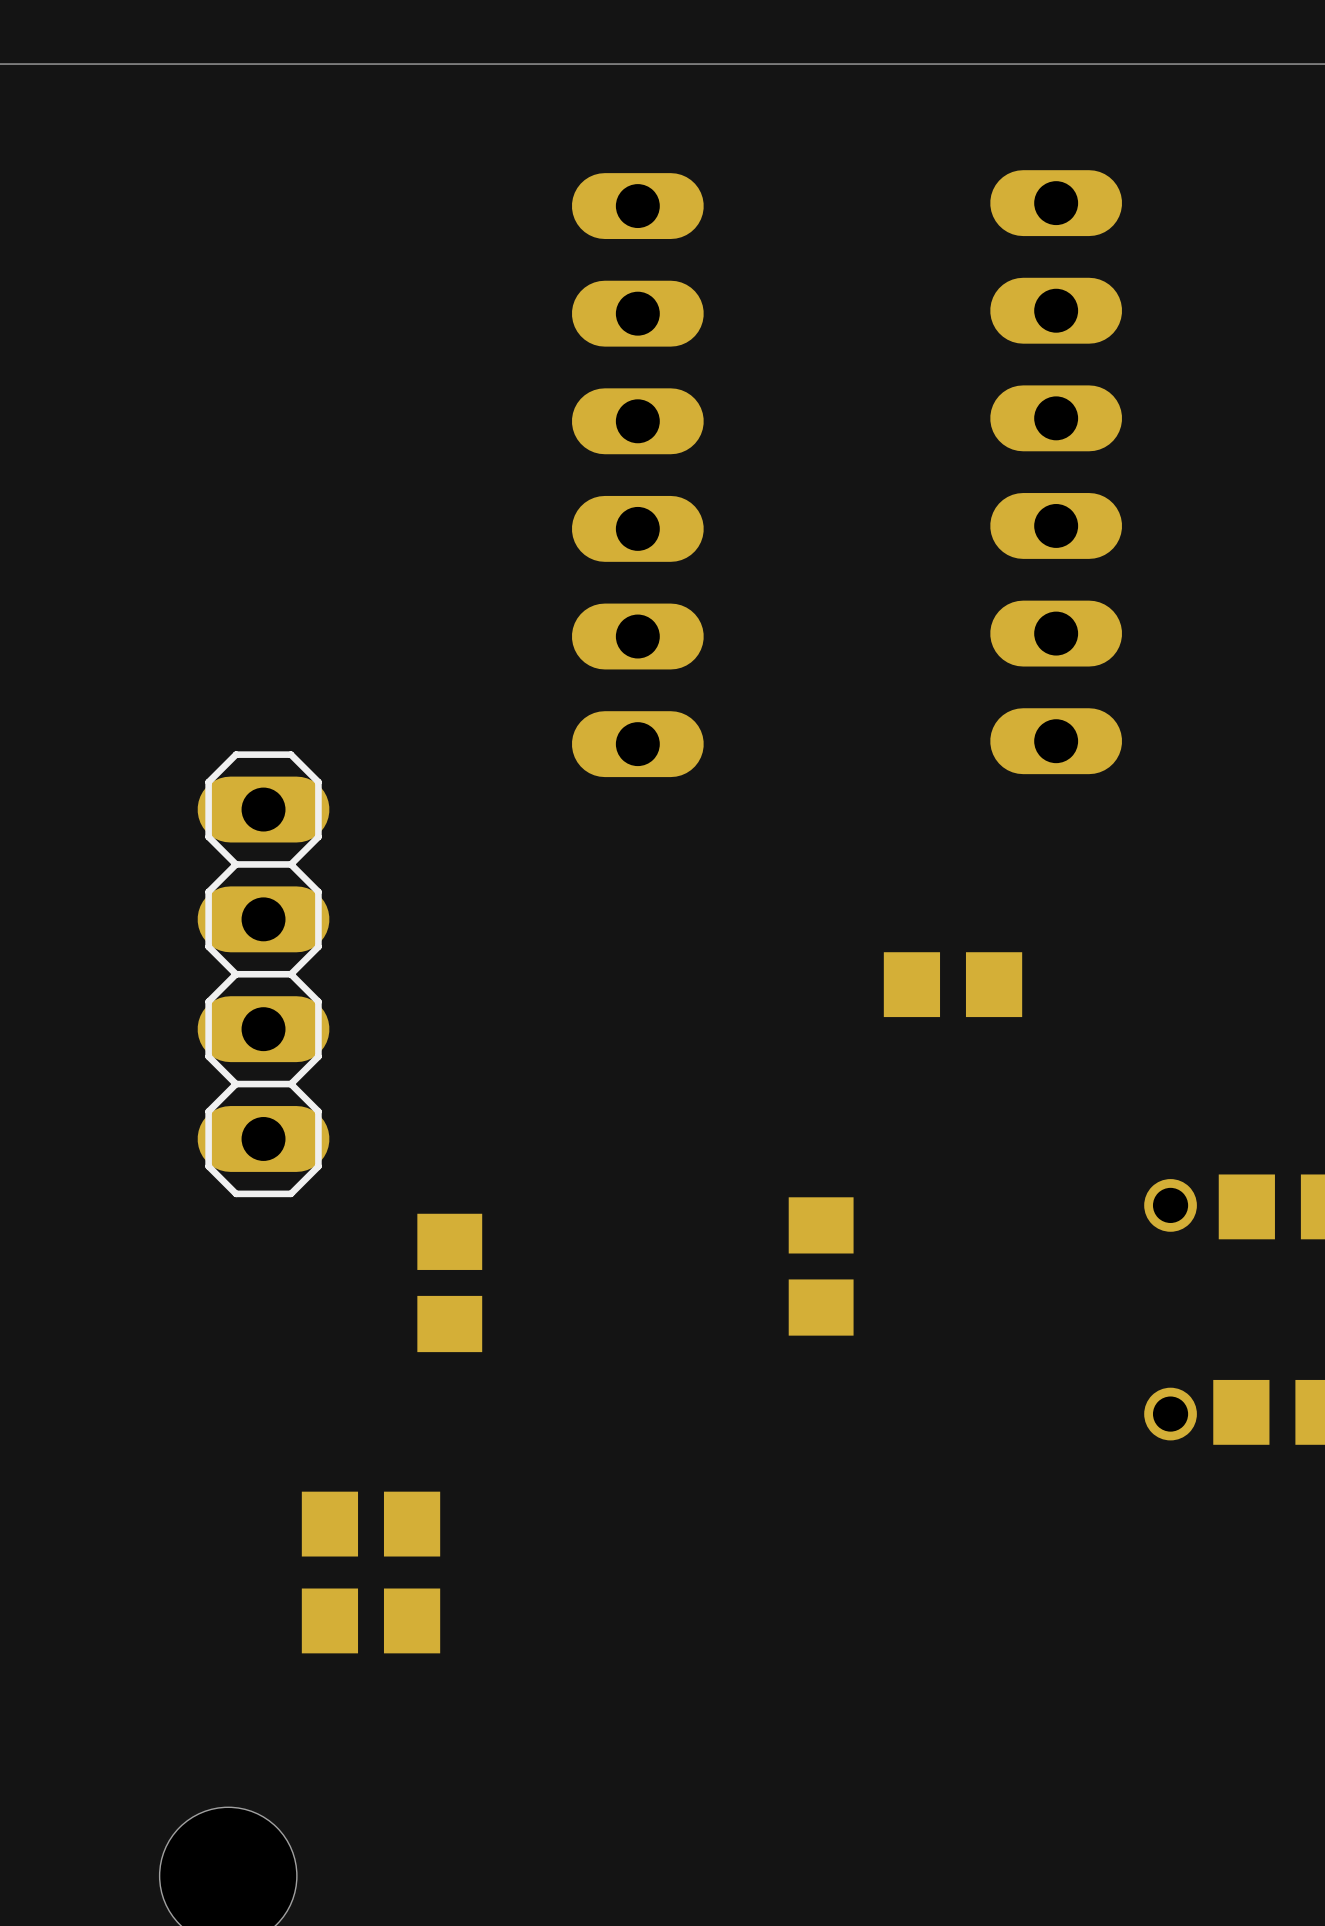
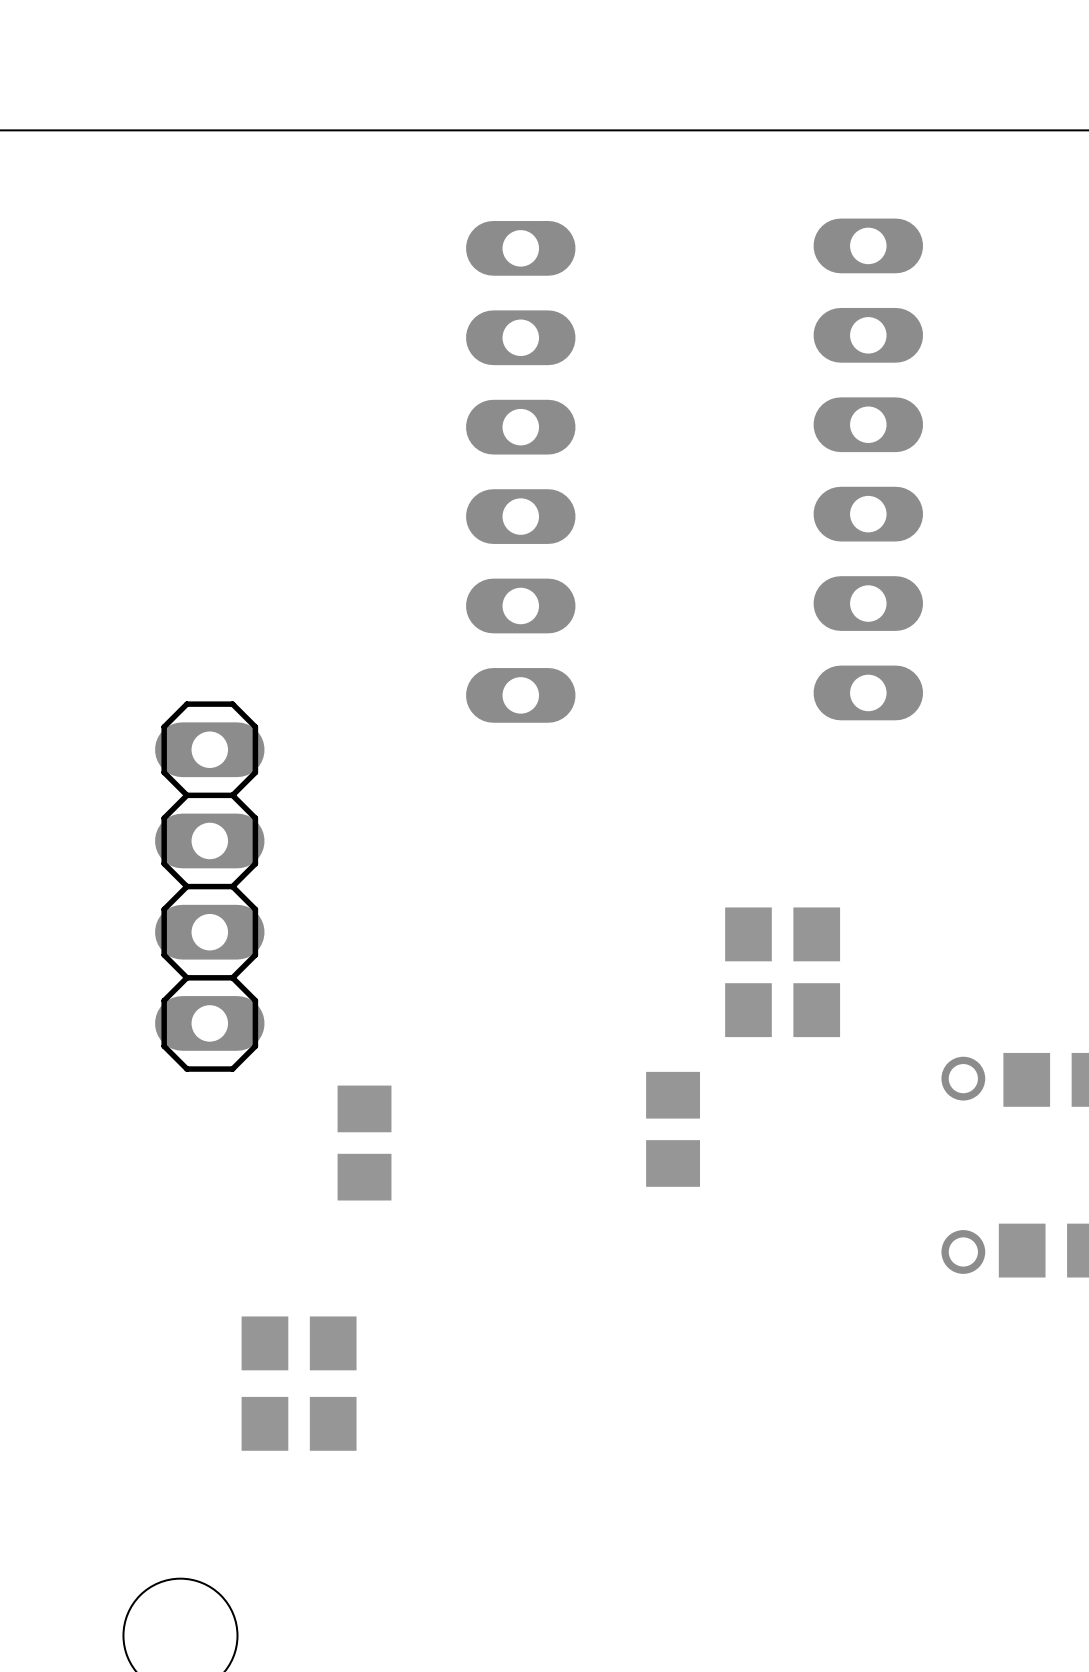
part position: (953, 984) -> (782, 934)
part: none -> (782, 1010)

